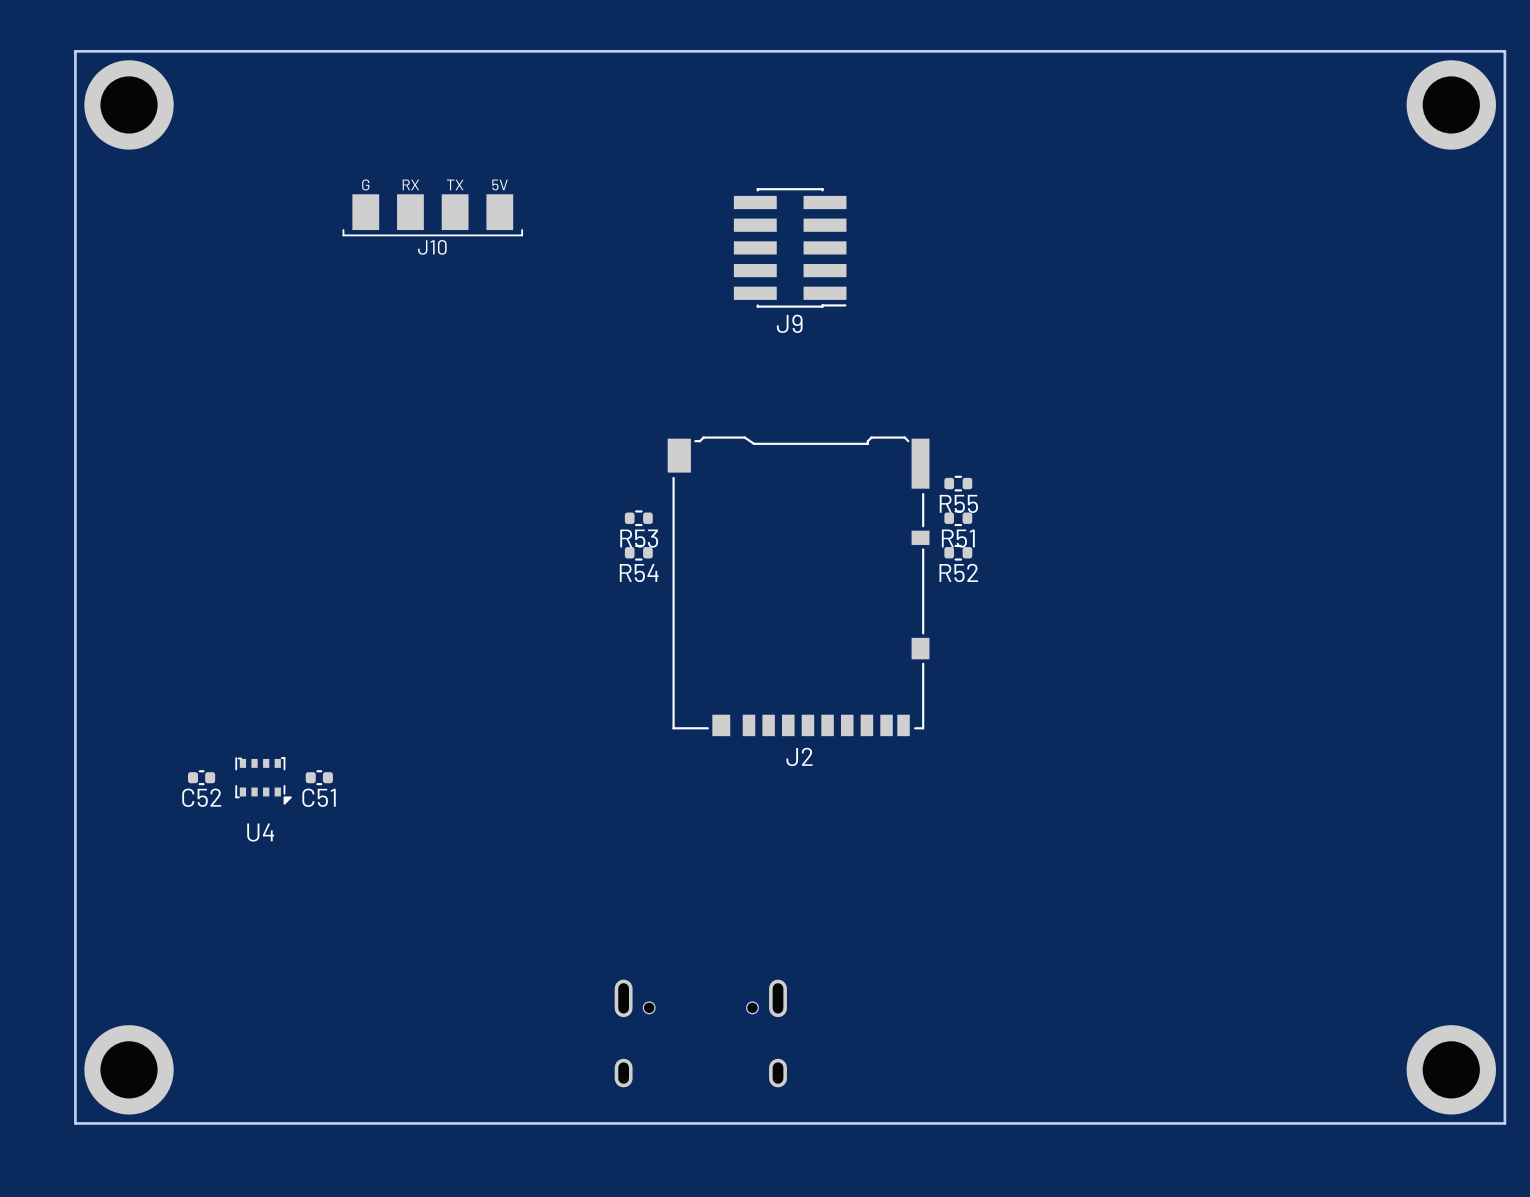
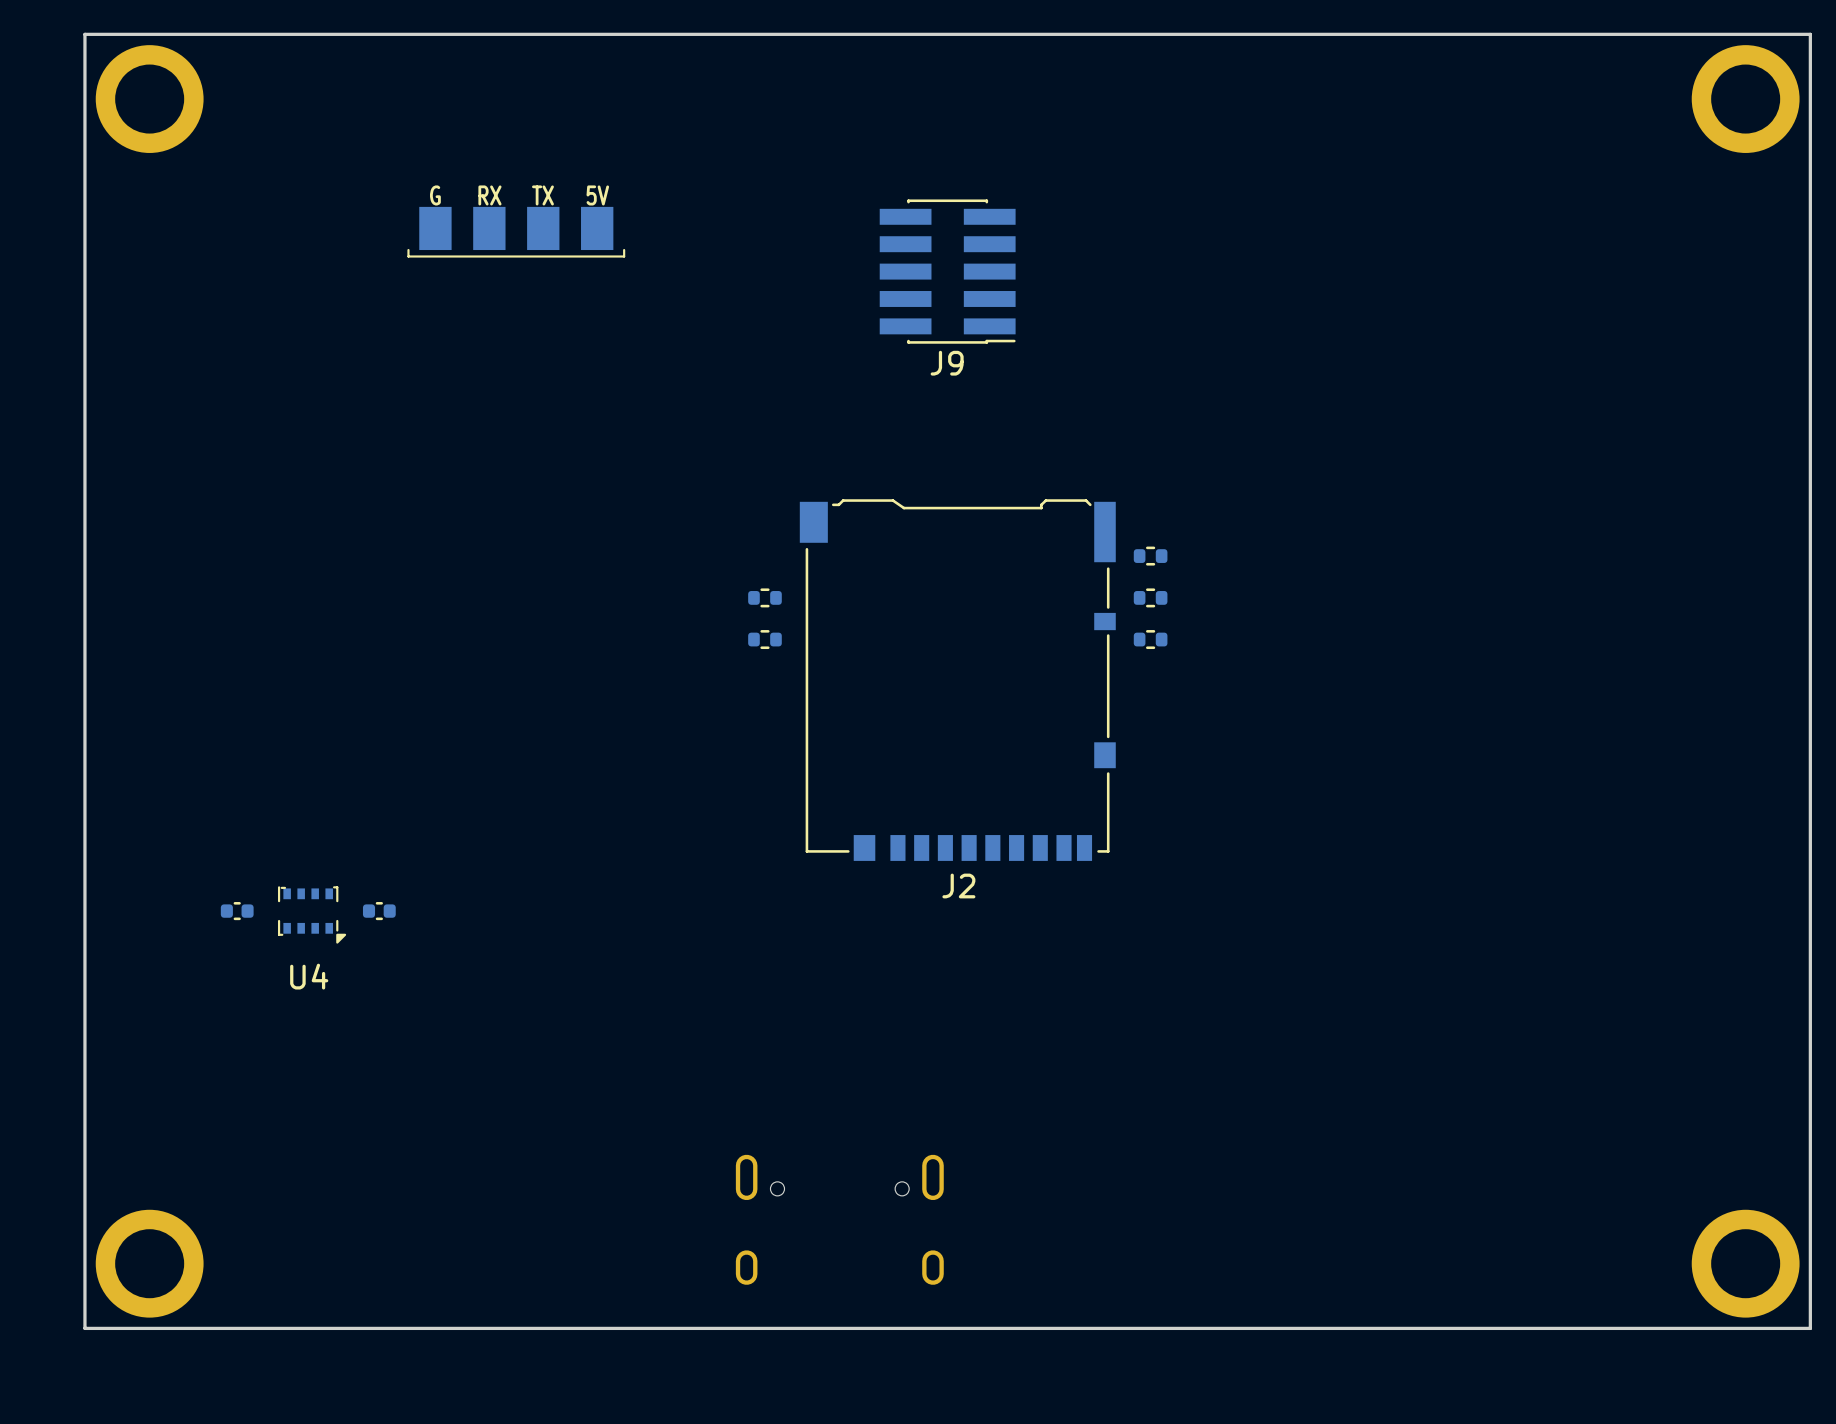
J10 footprint: [342, 194, 524, 237] -> [407, 206, 626, 258]
J10 name: J10 (432, 247) -> none
R55 name: R55 (958, 503) -> none
R53 name: R53 (639, 538) -> none
R51 name: R51 (958, 538) -> none
R52 name: R52 (958, 572) -> none
R54 name: R54 (639, 573) -> none
C52 name: C52 (201, 797) -> none
C51 name: C51 (319, 797) -> none

